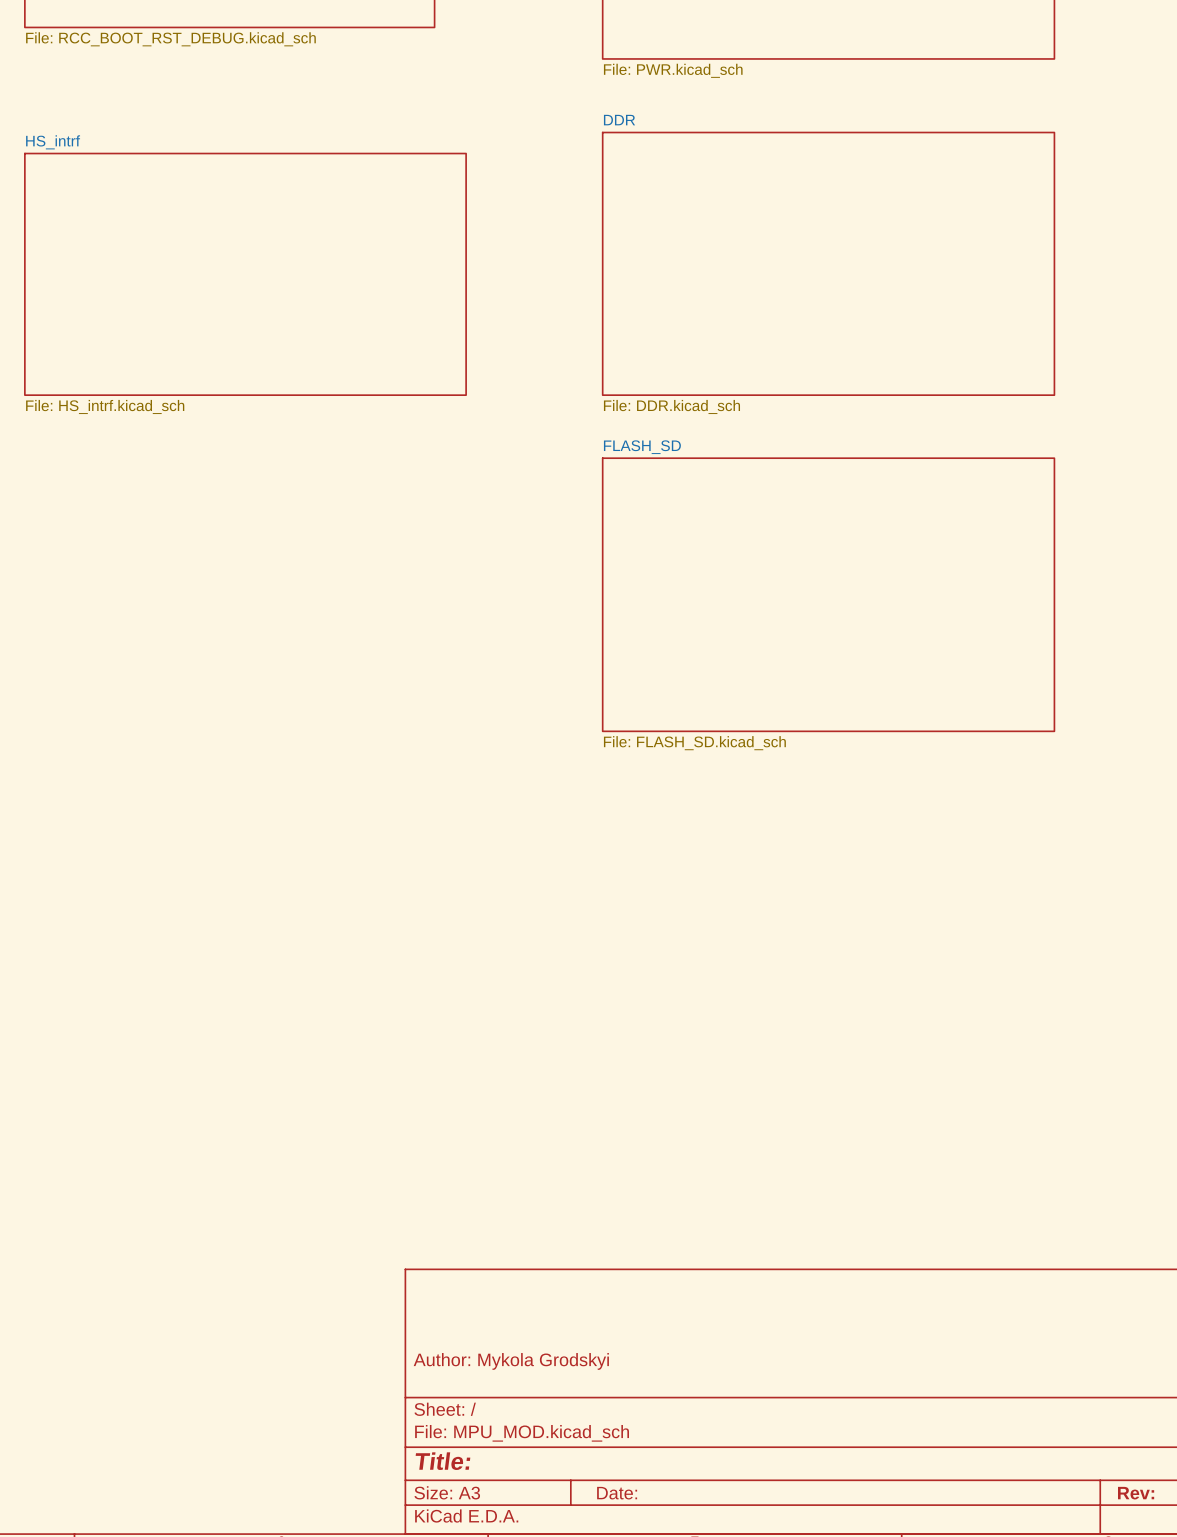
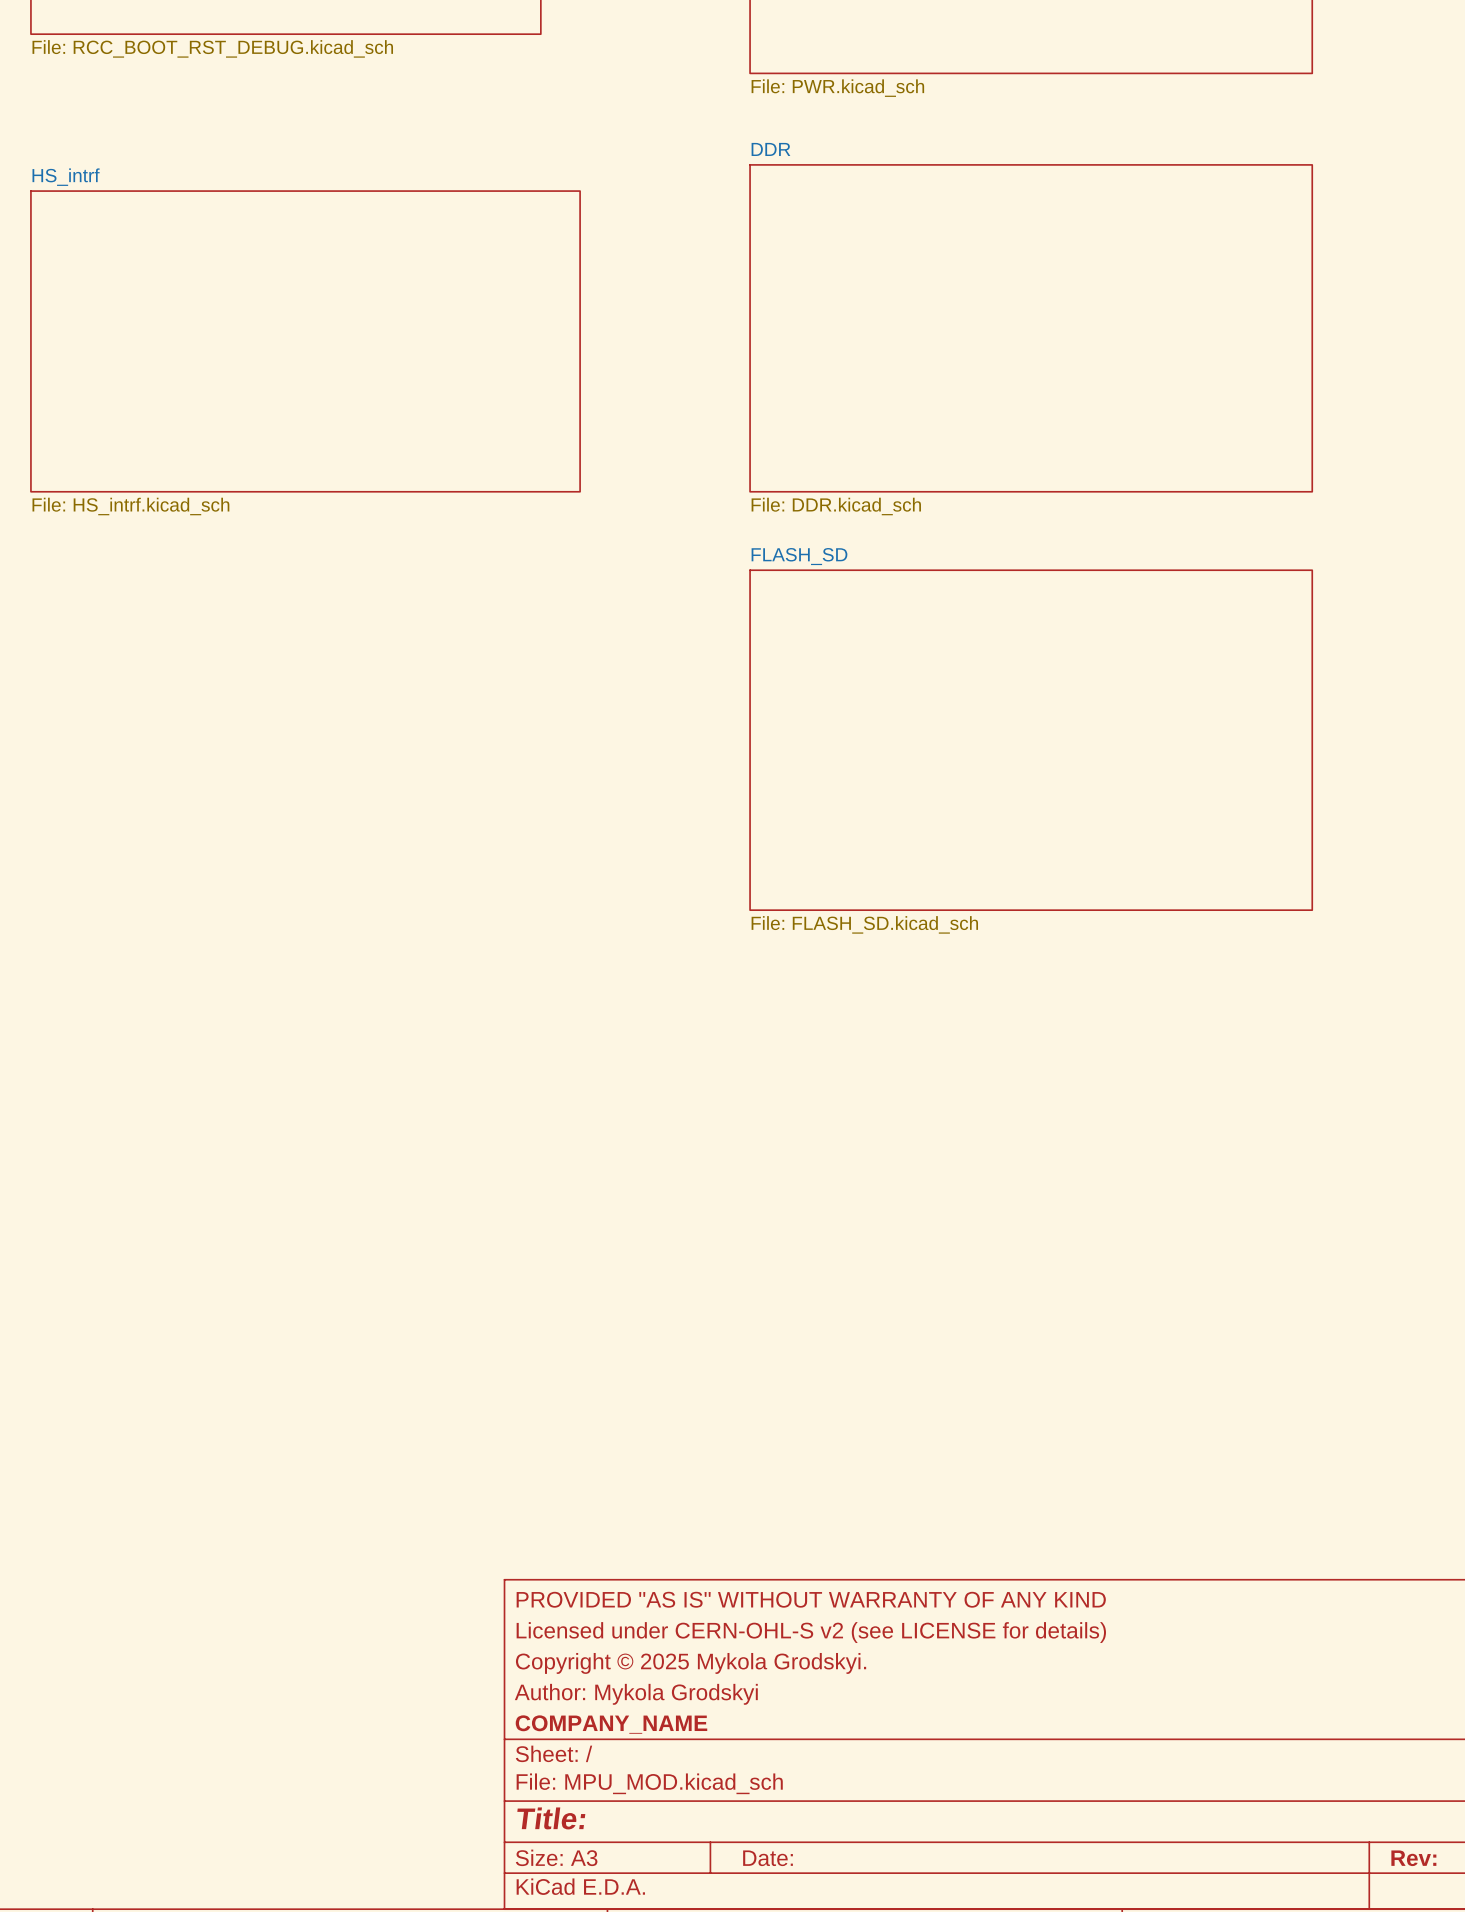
title block: none -> PROVIDED "AS IS" WITHOUT WARRANTY OF ANY KIND (811, 1599)
title block: none -> Licensed under CERN-OHL-S v2 (see LICENSE for details) (811, 1632)
title block: none -> Copyright © 2025 Mykola Grodskyi. (691, 1663)
title block: none -> COMPANY_NAME (611, 1724)

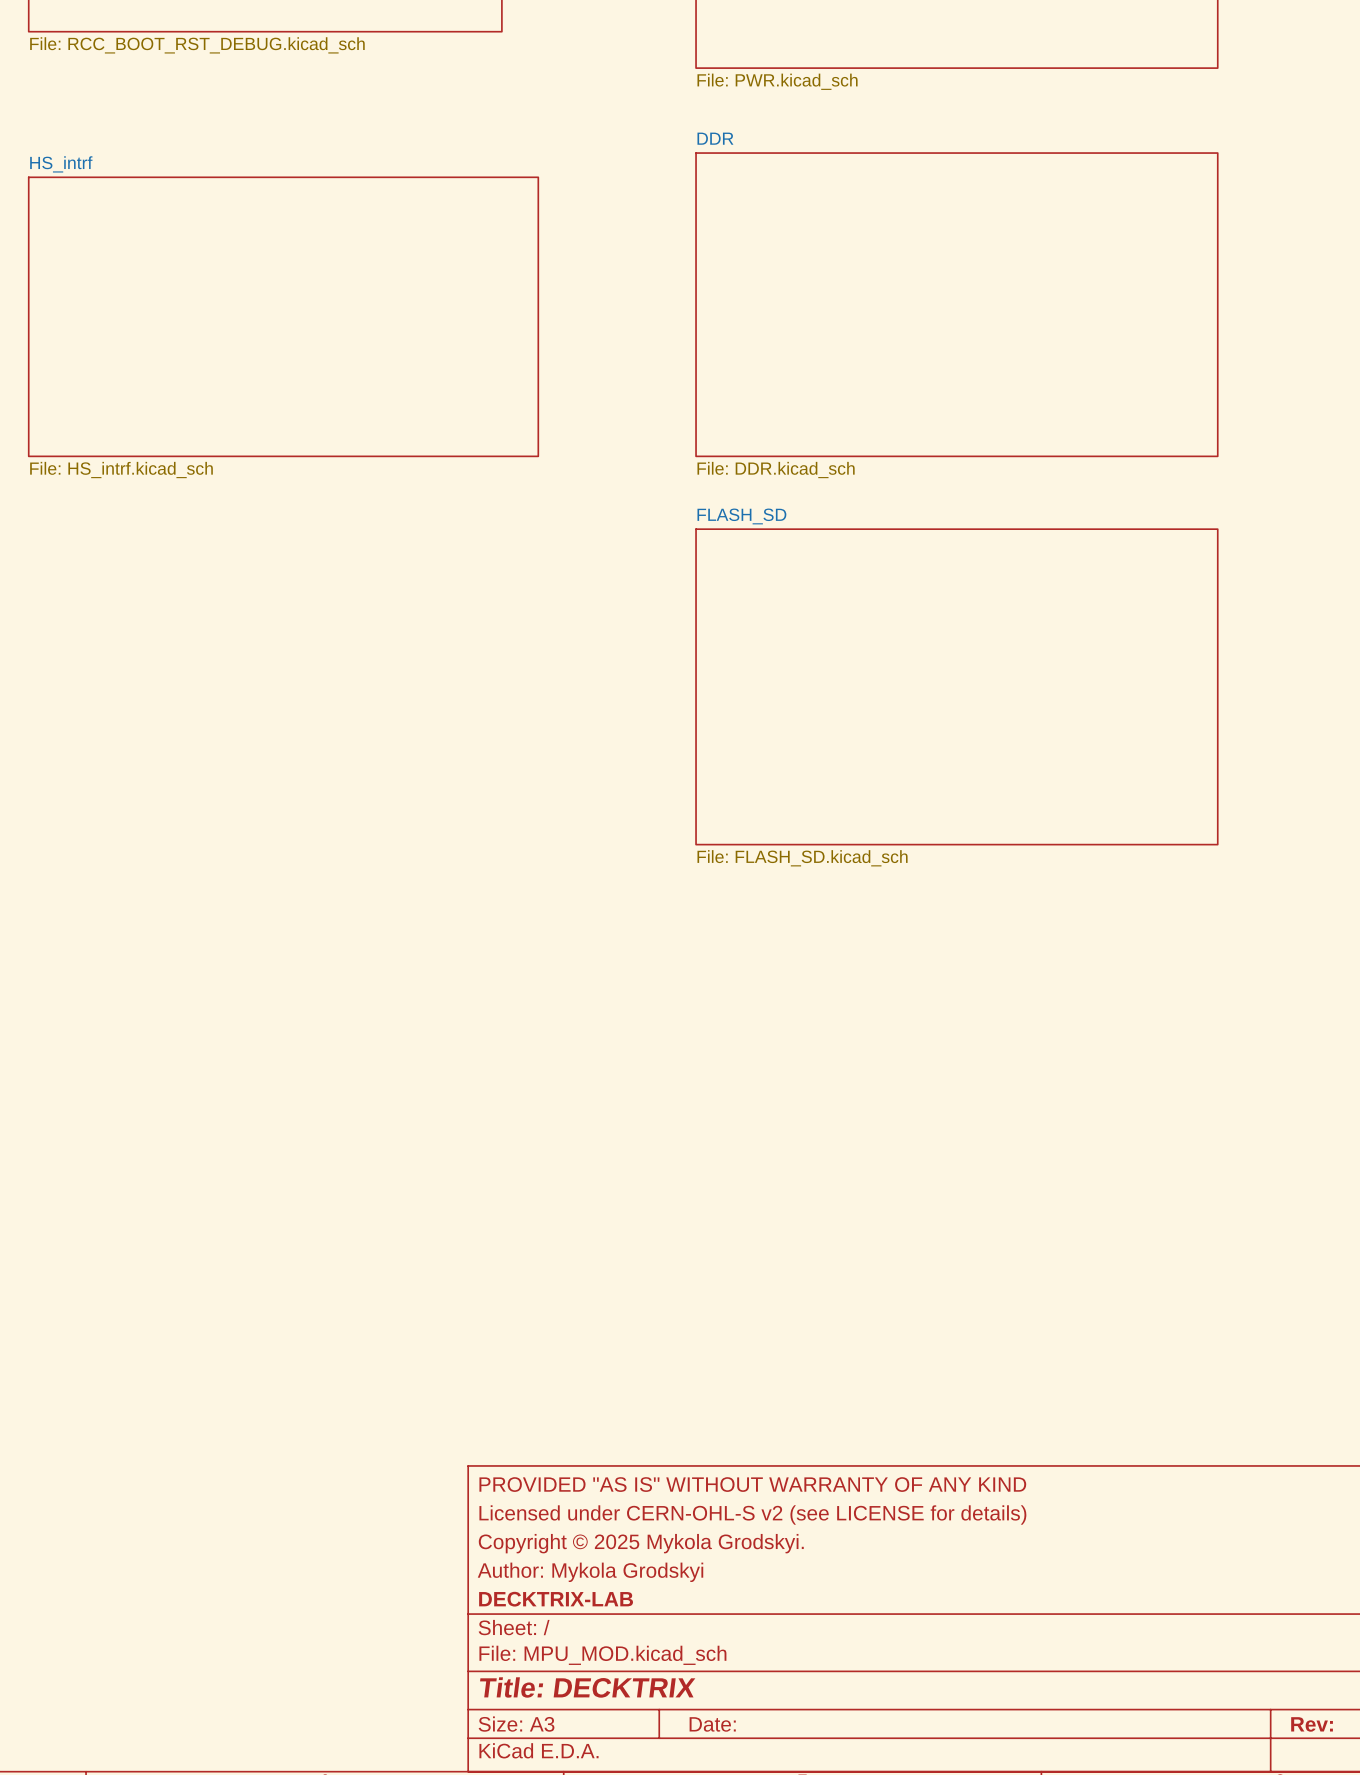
title block: COMPANY_NAME (611, 1724) -> DECKTRIX-LAB (556, 1599)
title block: Title: (551, 1818) -> Title: DECKTRIX (587, 1687)

